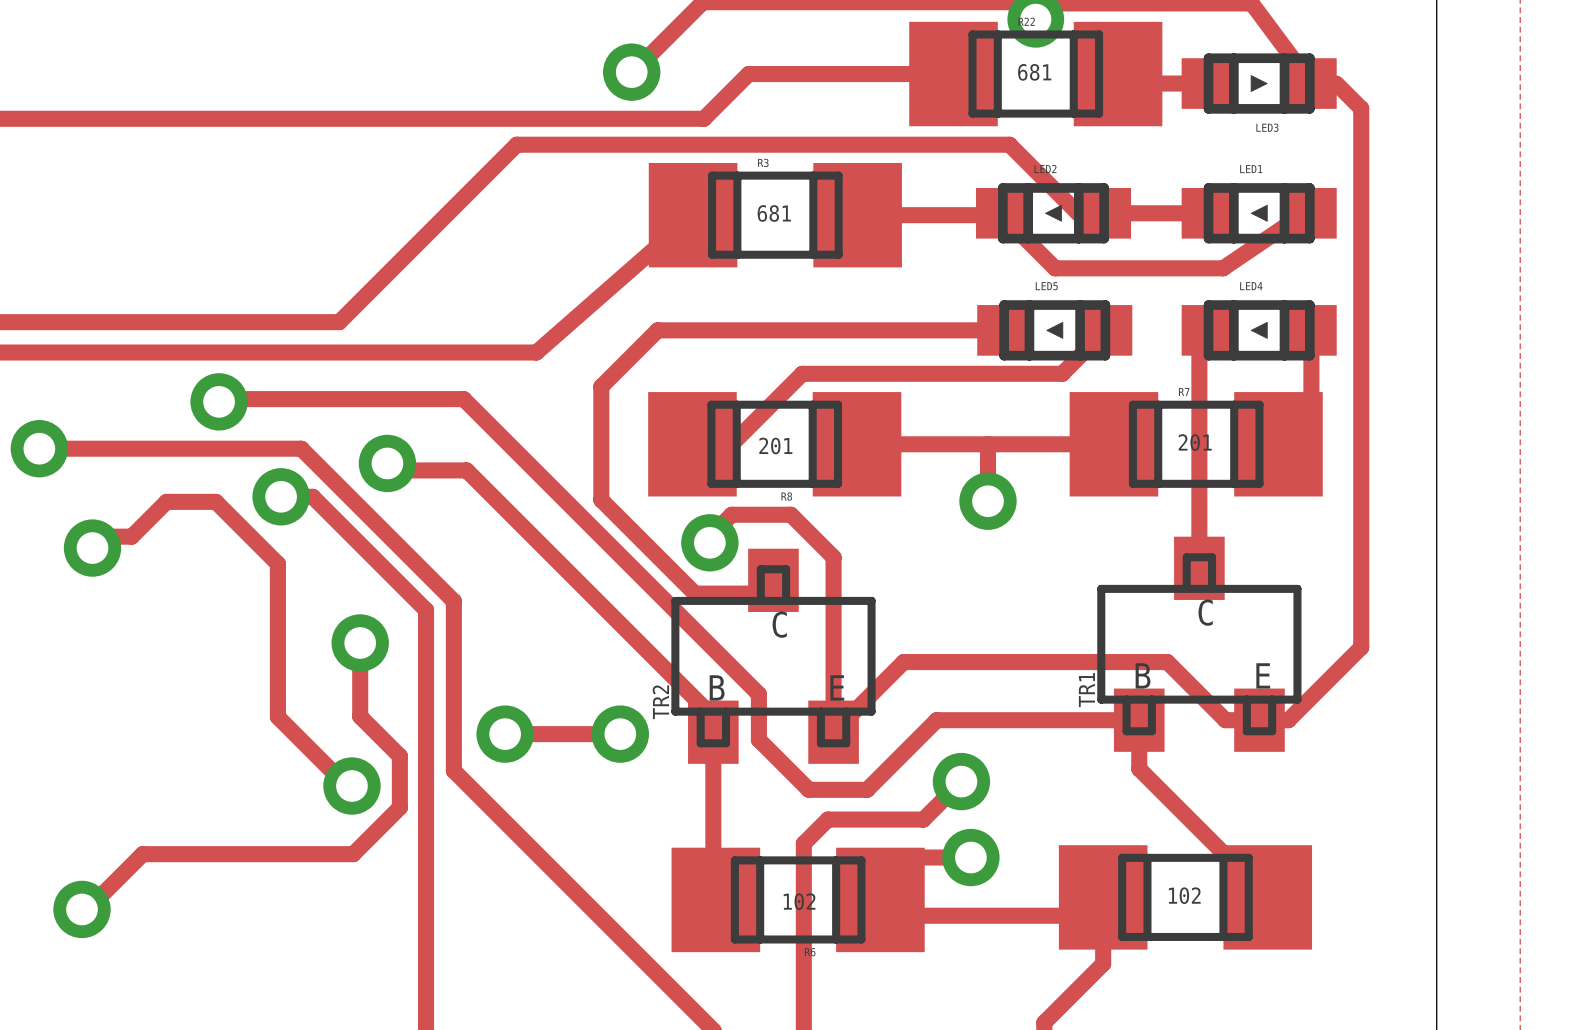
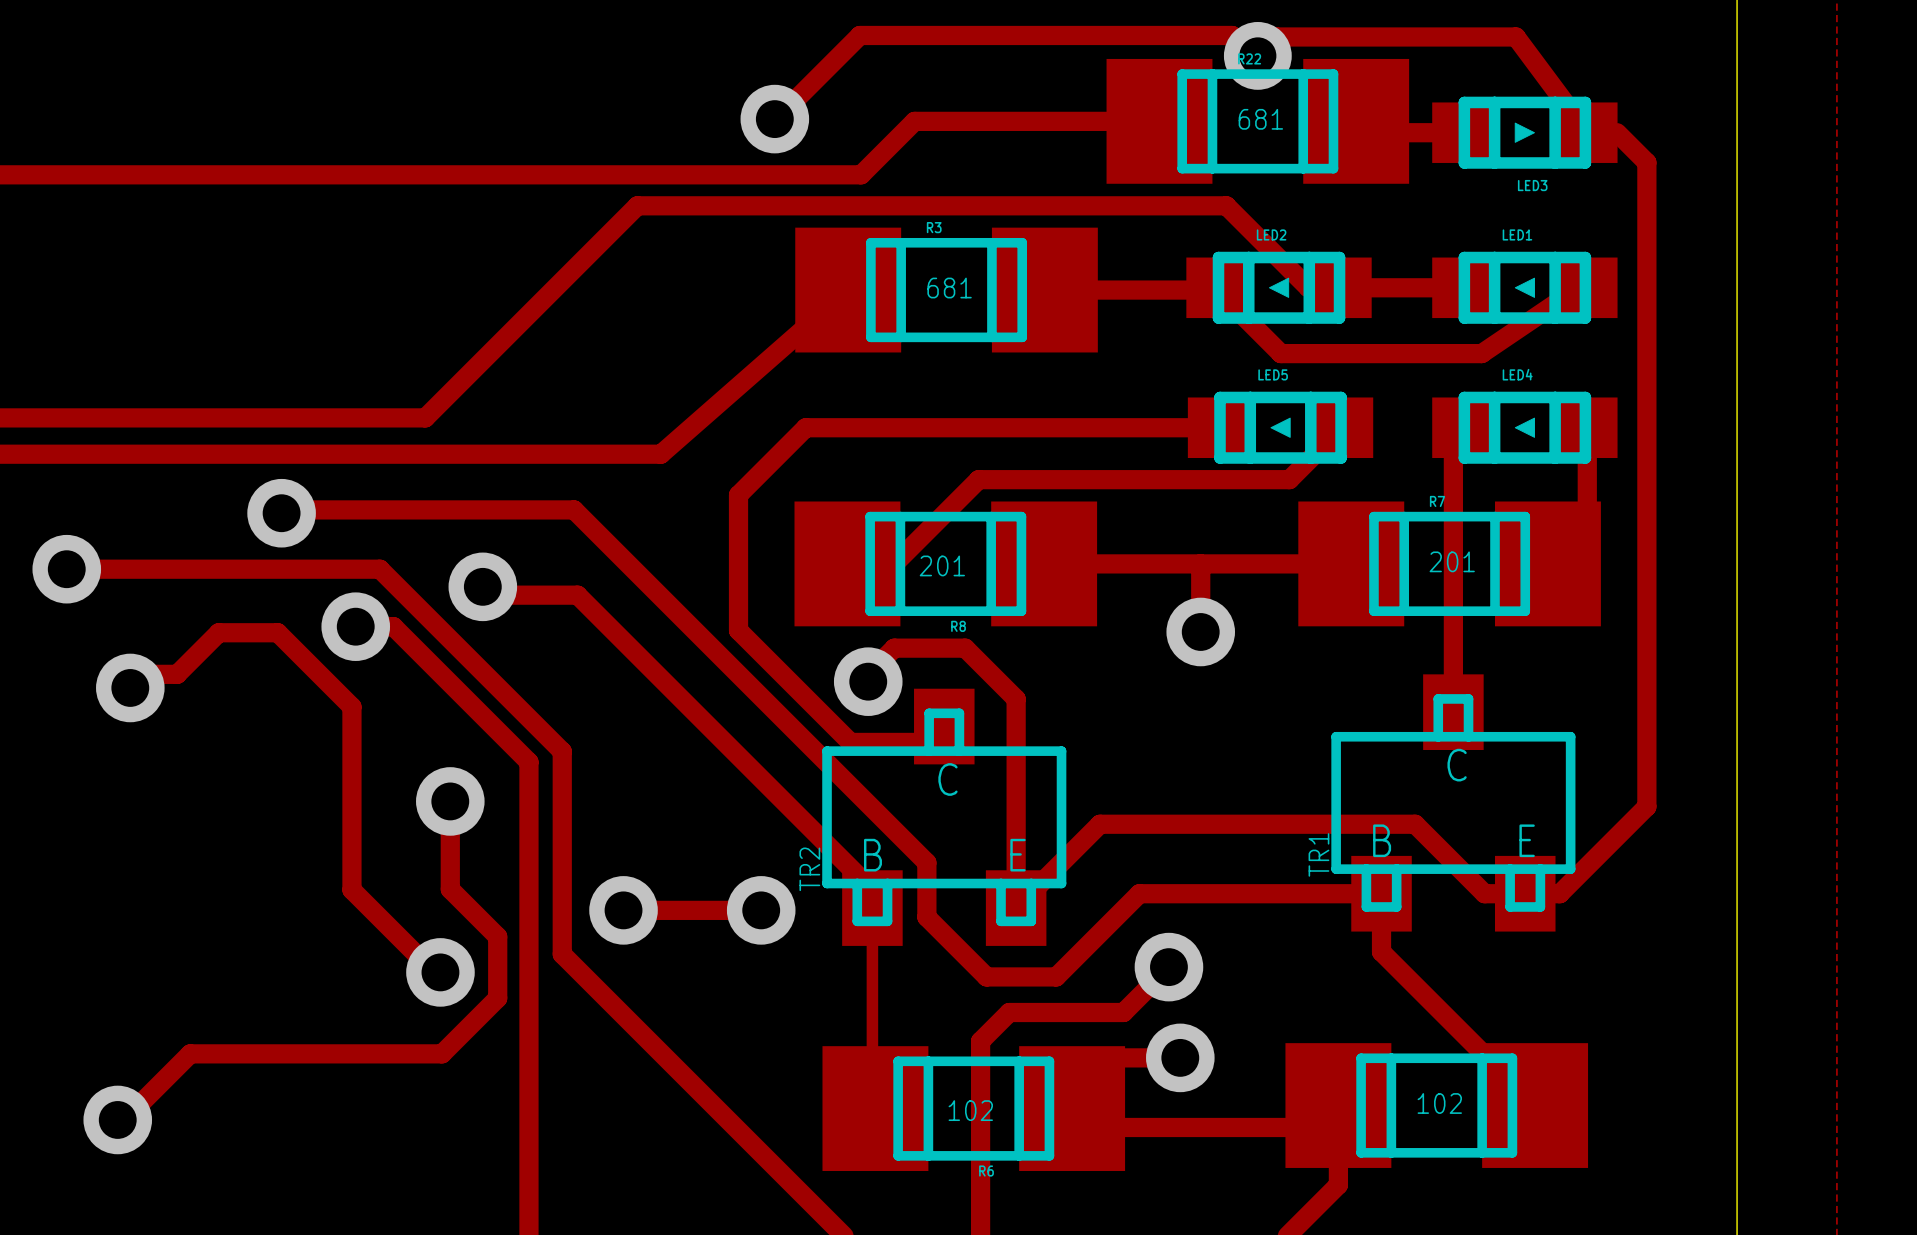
track width: thick (713, 732) (713, 897) -> thin (872, 908) (872, 1105)

